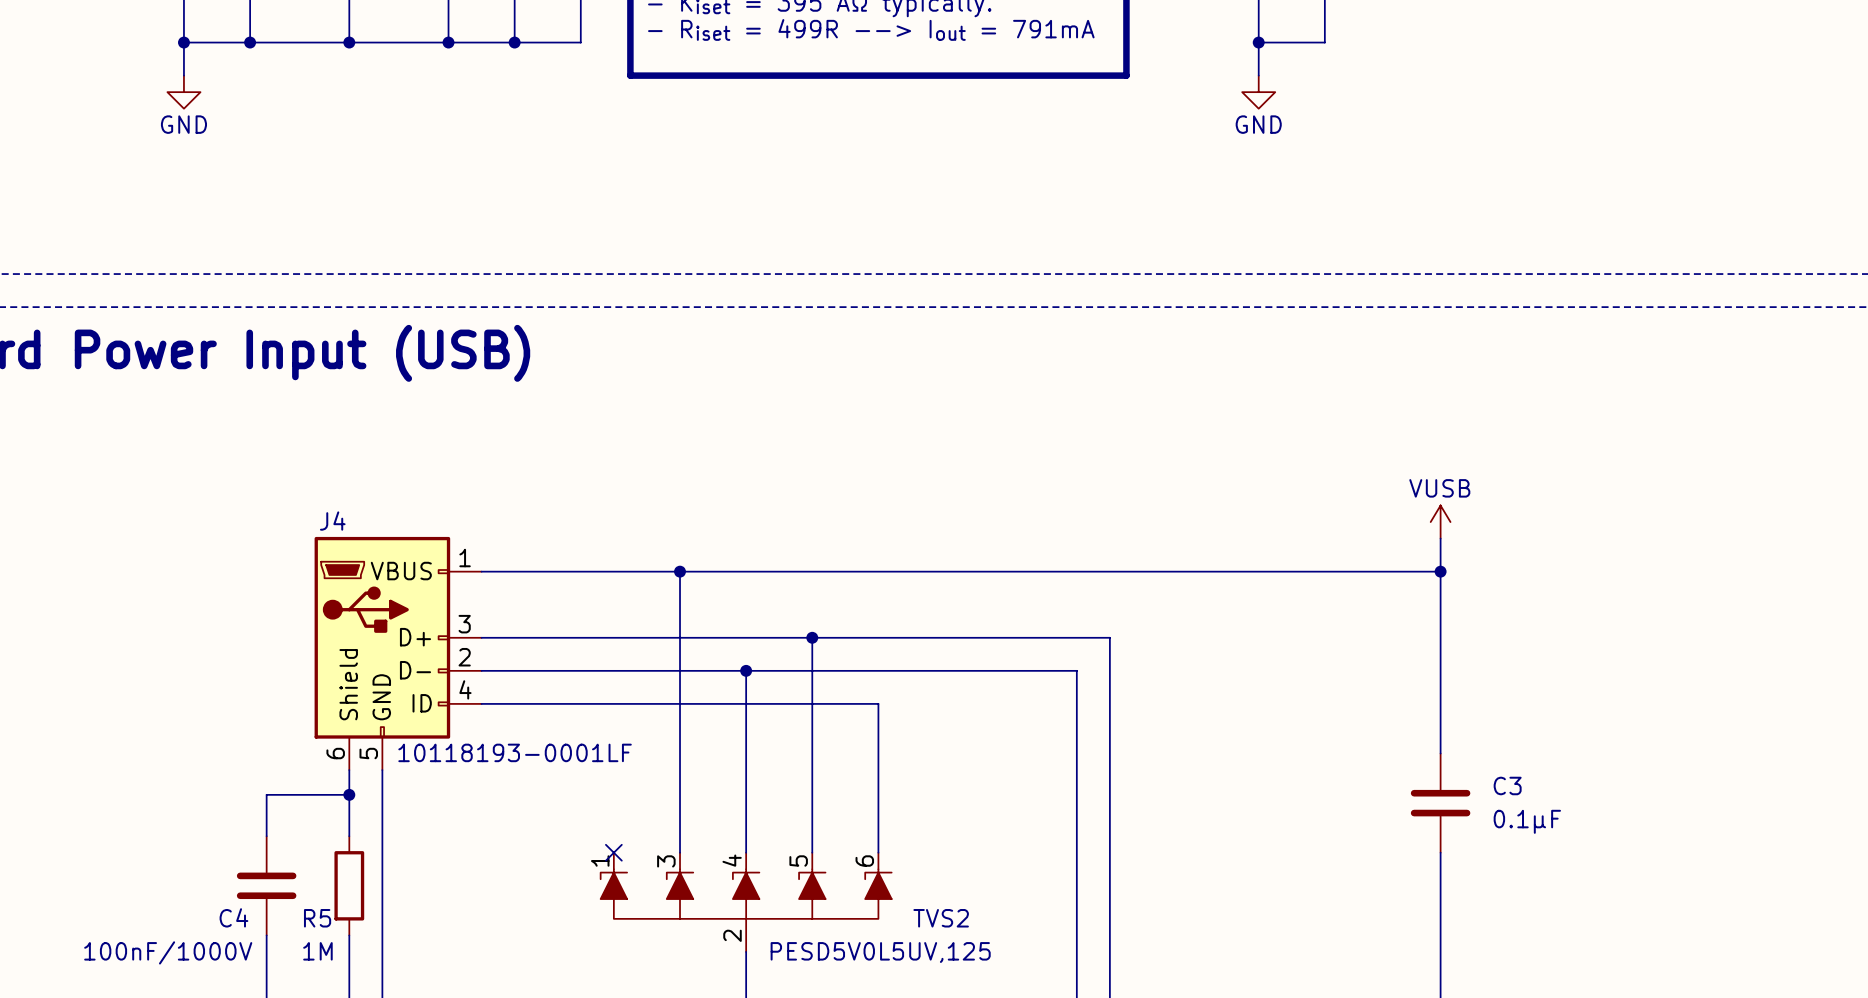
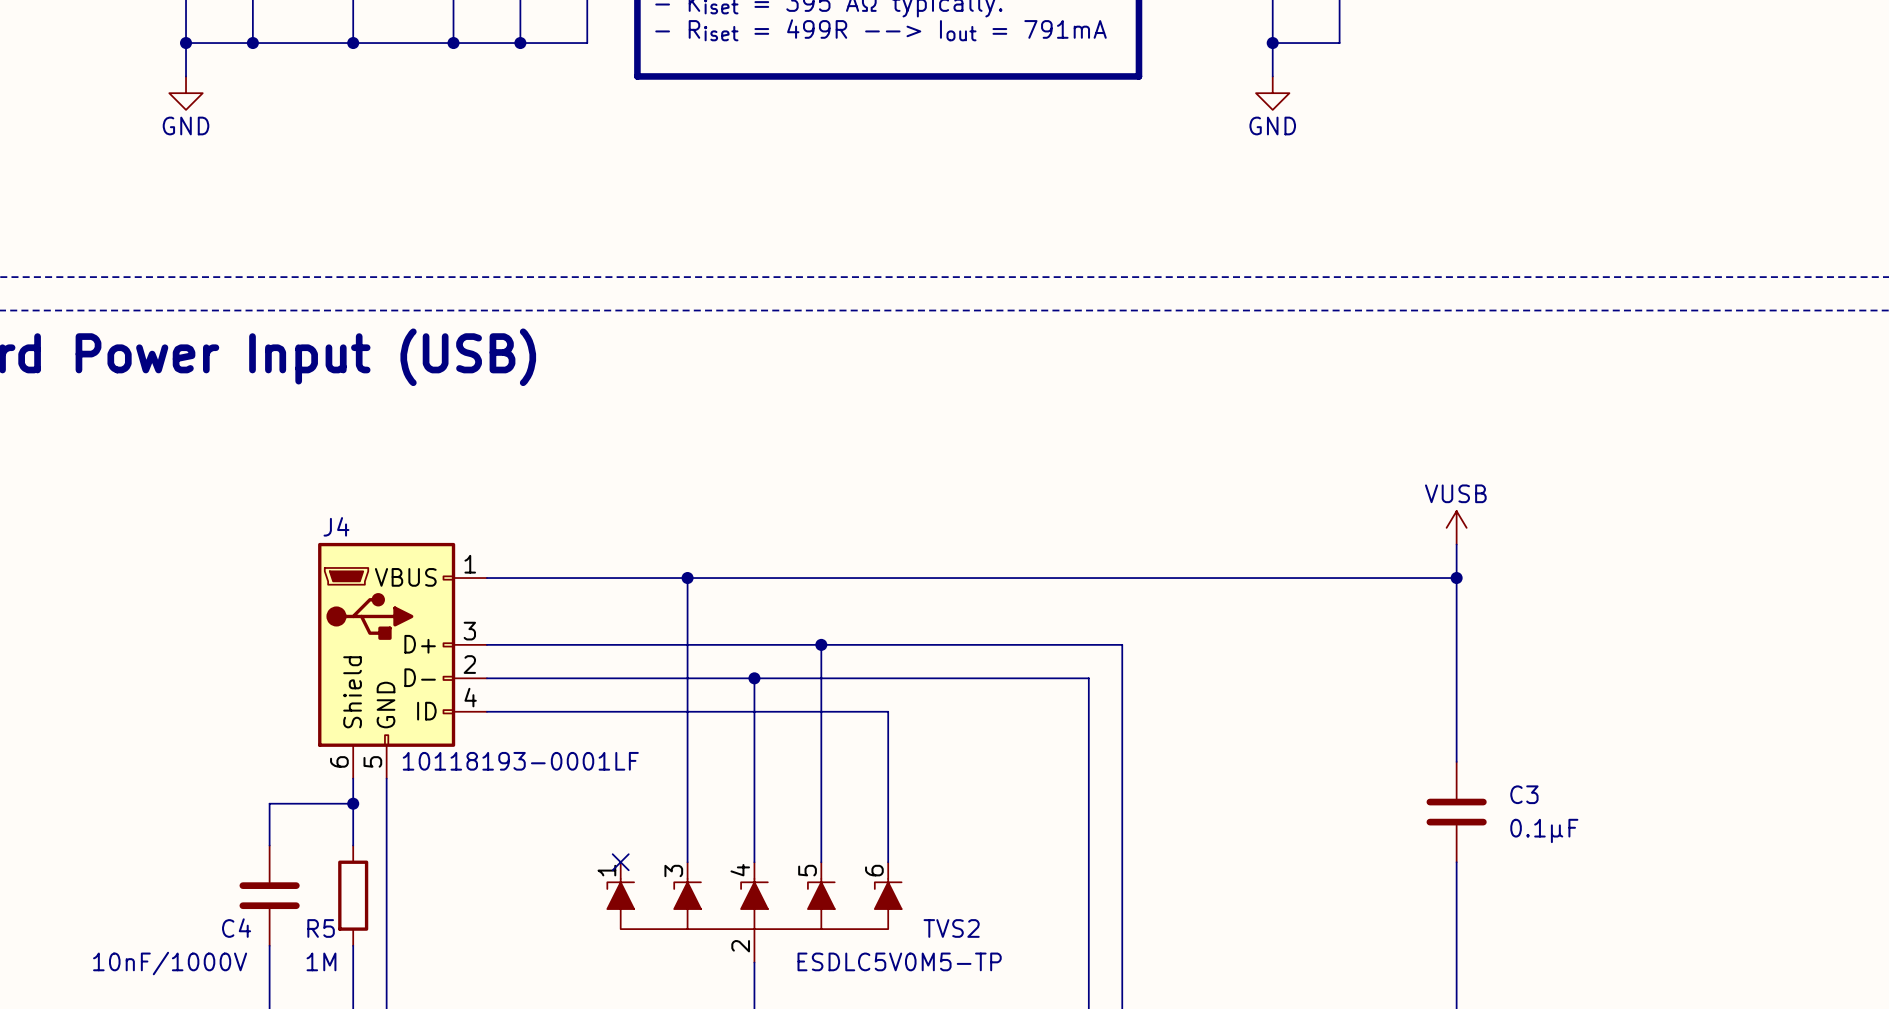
C4 value: 100nF/1000V (168, 952) -> 10nF/1000V (170, 963)
TVS2 value: PESD5V0L5UV,125 (880, 952) -> ESDLC5V0M5-TP (899, 961)

